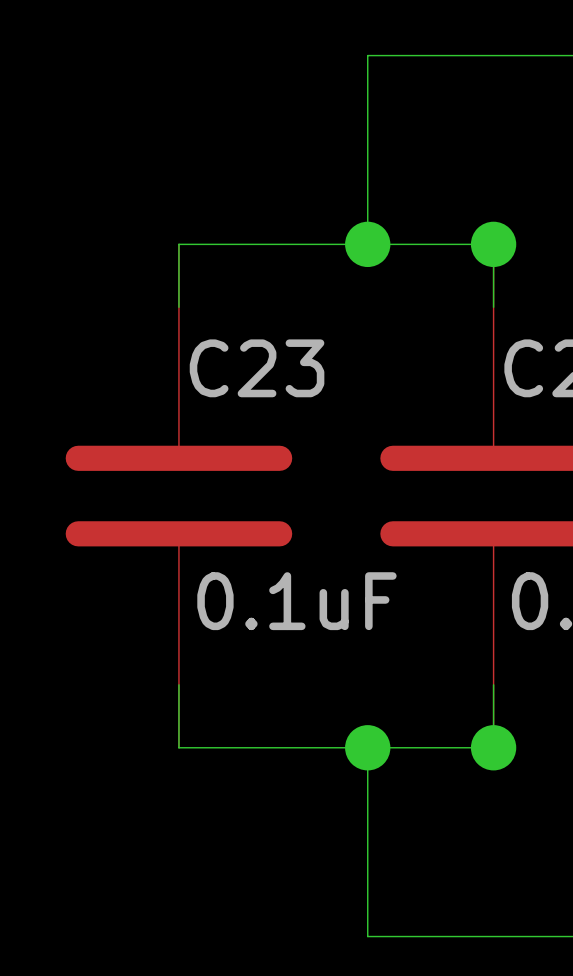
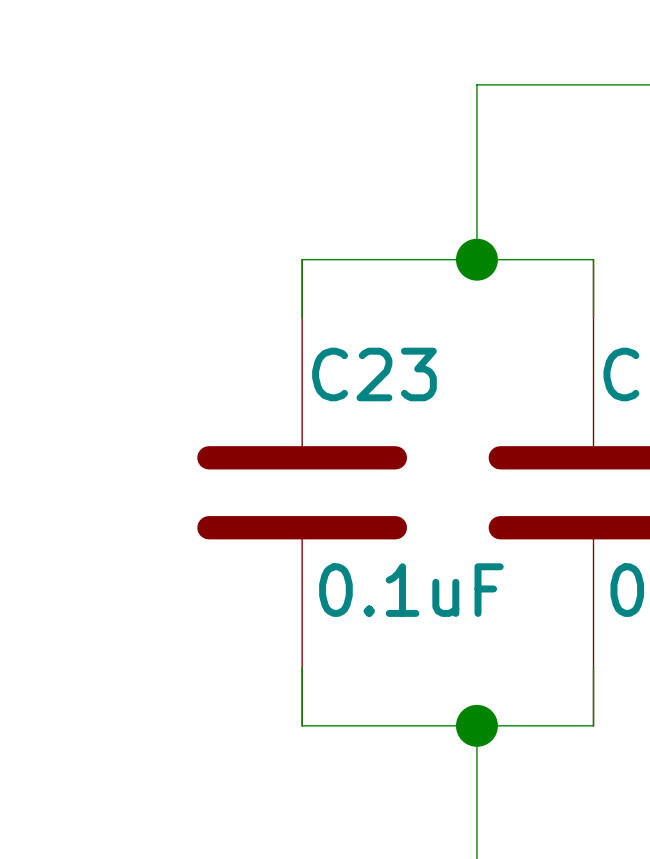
junction: (493, 244) -> none
junction: (493, 747) -> none

